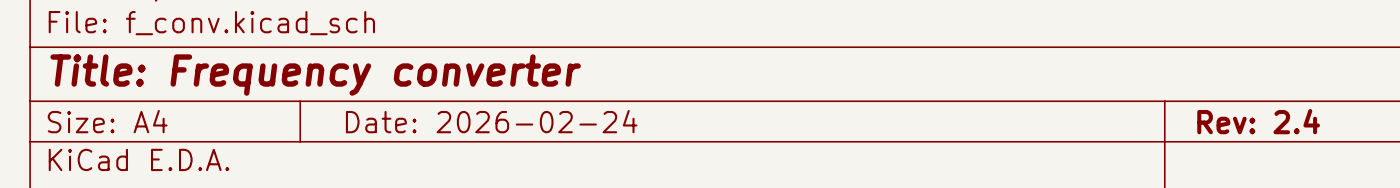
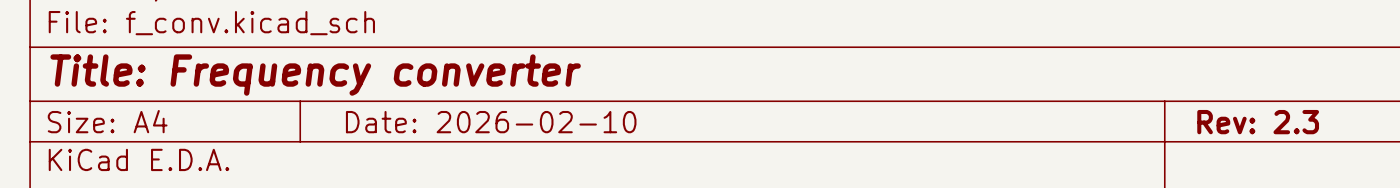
title block: Date: 2026-02-24 (491, 121) -> Date: 2026-02-10 (491, 122)
title block: Rev: 2.4 (1258, 121) -> Rev: 2.3 (1258, 122)

